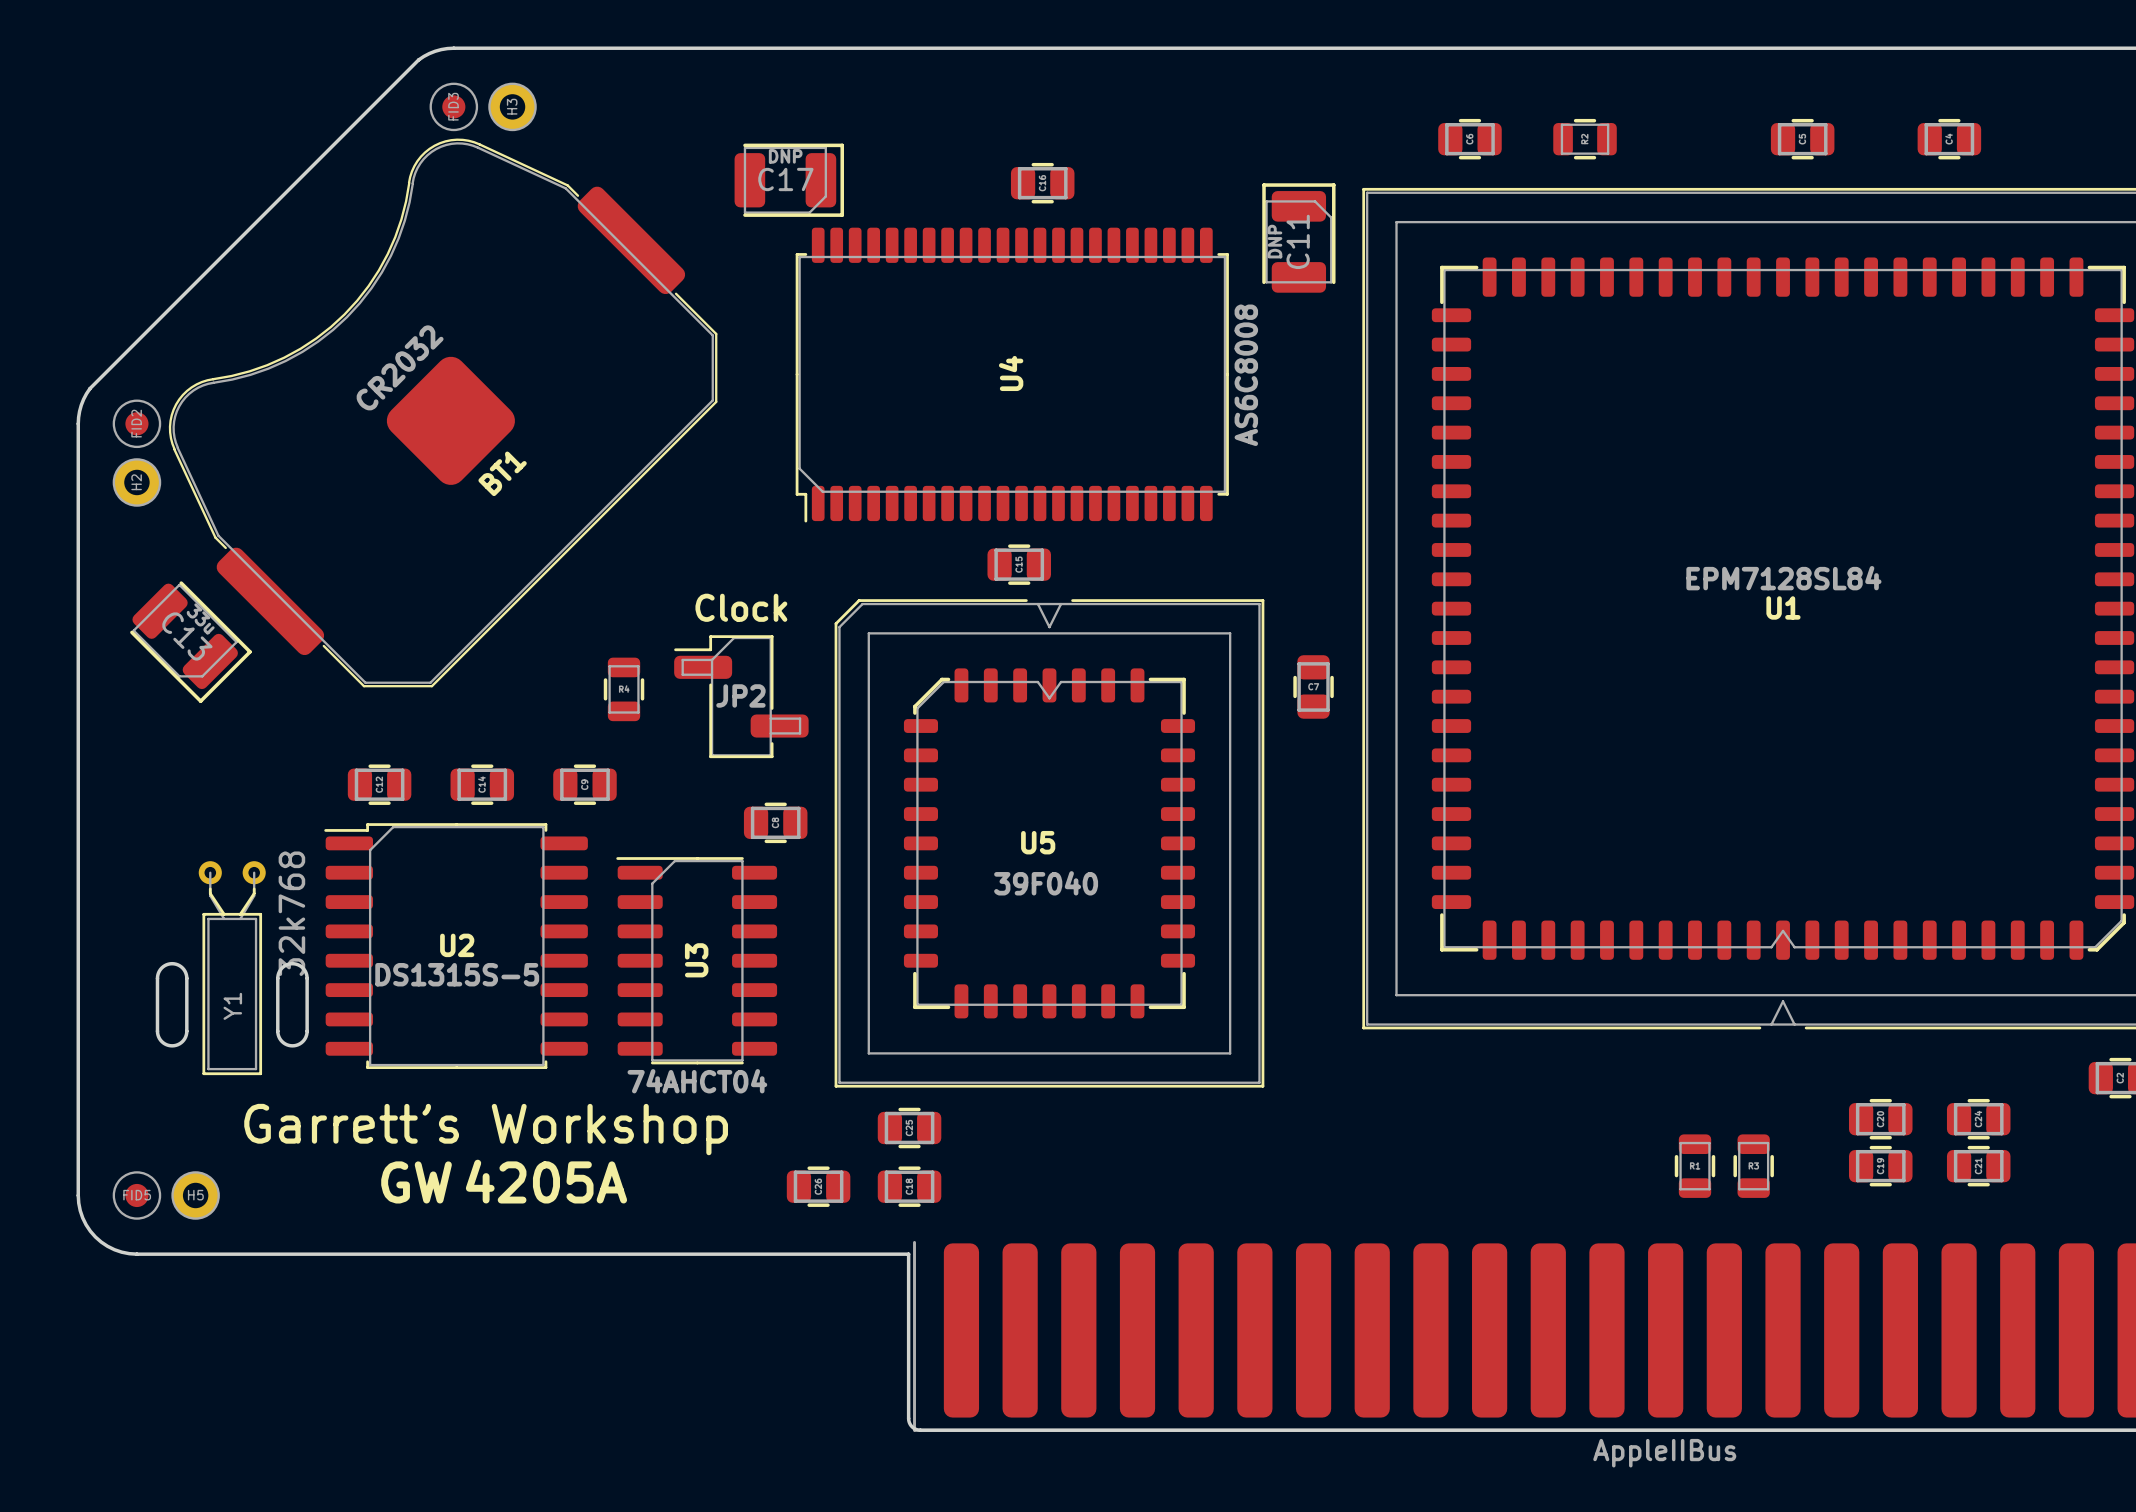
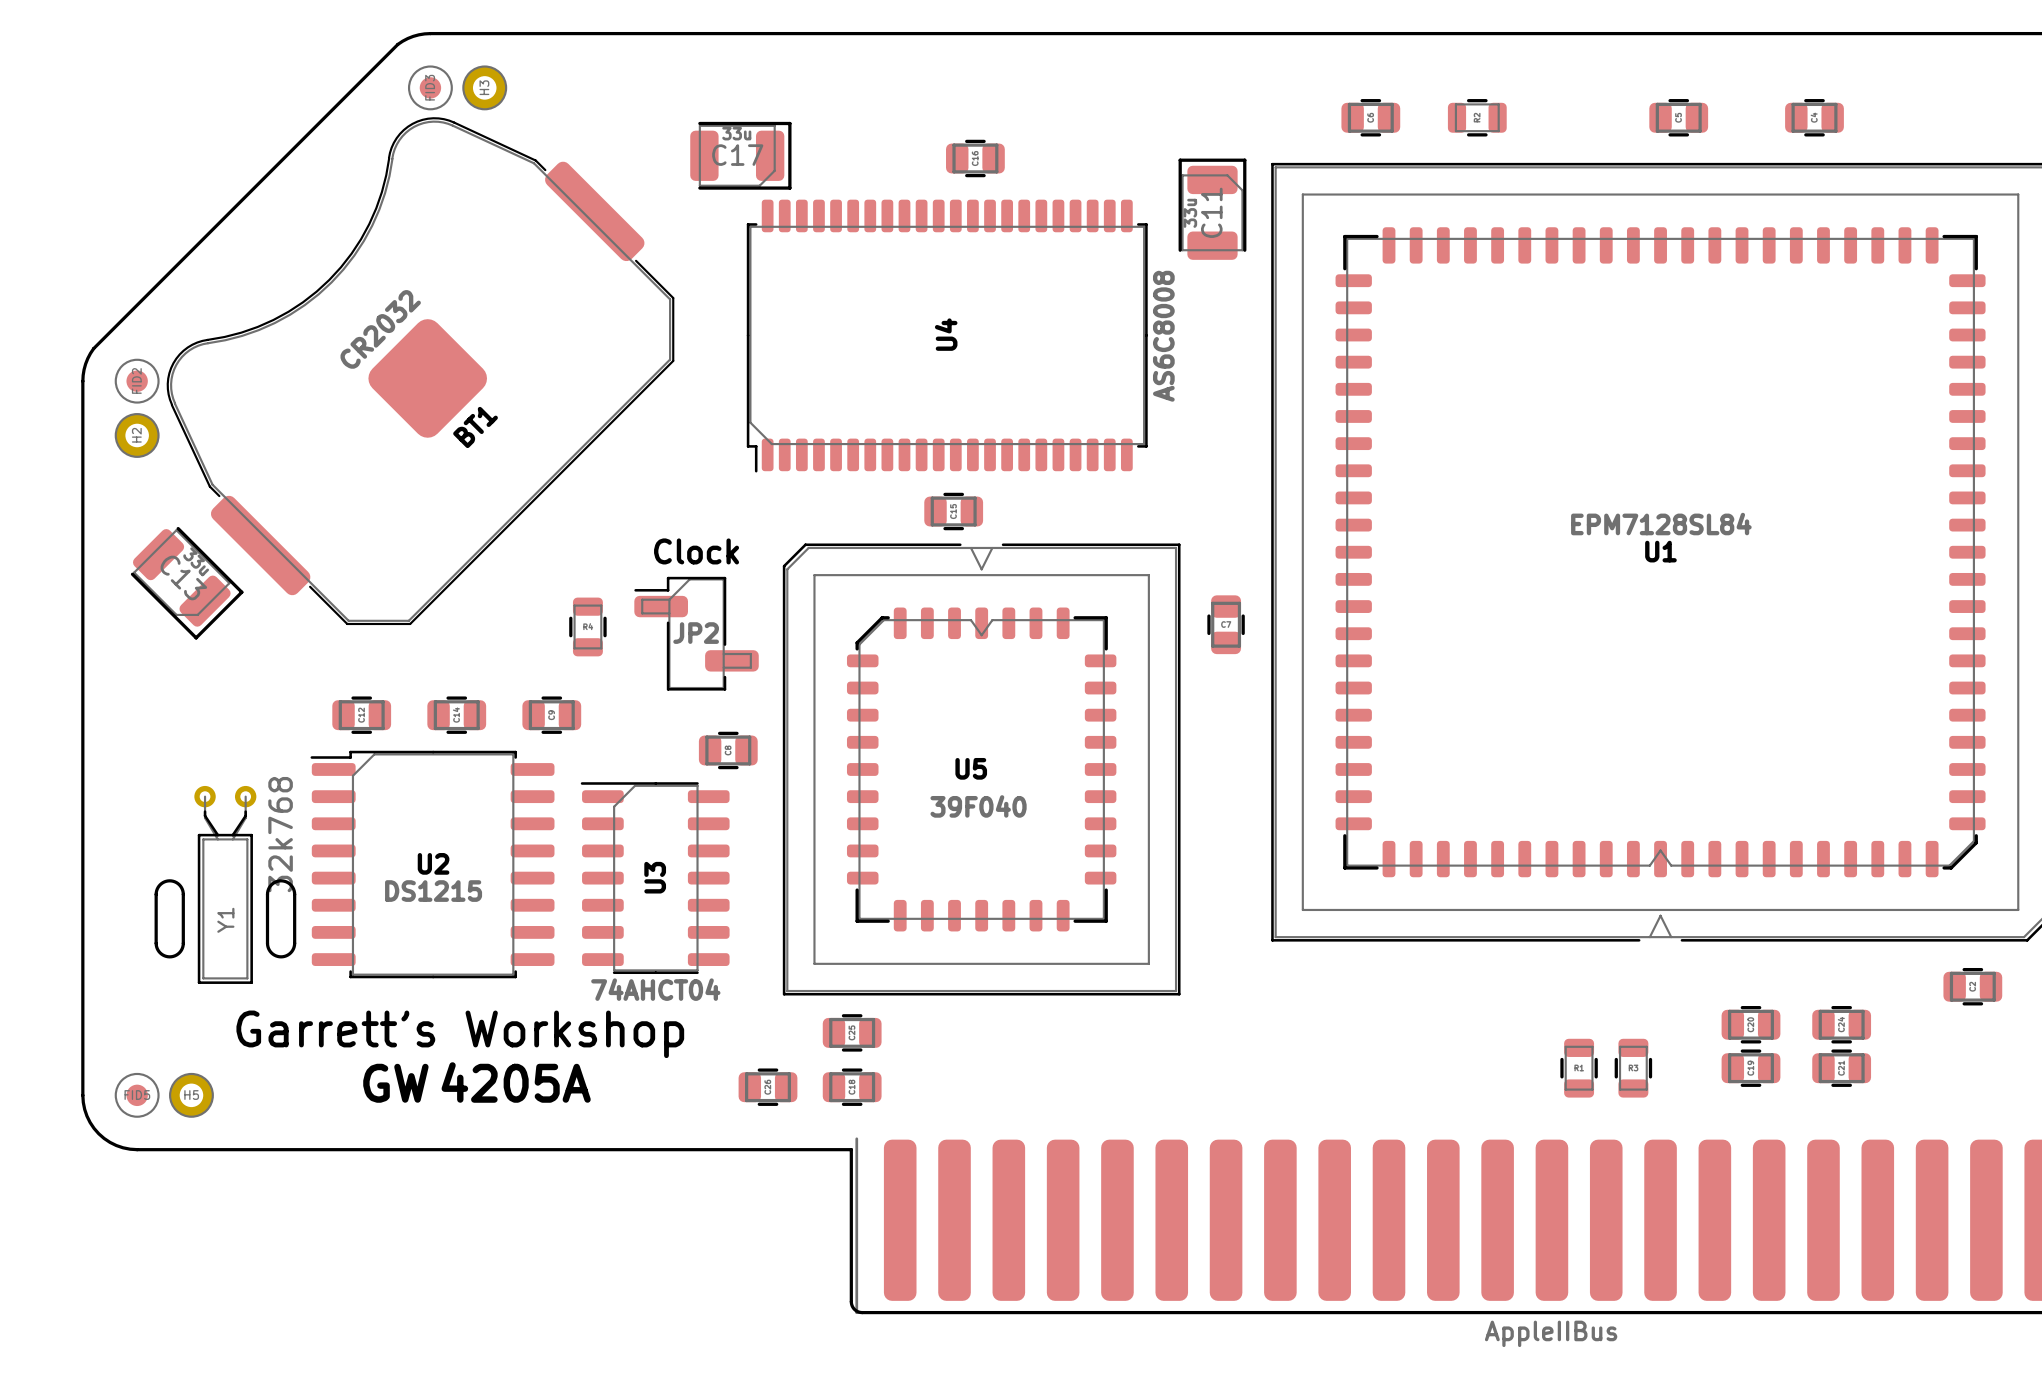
C17 value: DNP (785, 156) -> 33u (736, 133)
C11 value: DNP (1274, 241) -> 33u (1190, 213)
U2 value: DS1315S-5 (457, 974) -> DS1215 (433, 891)

